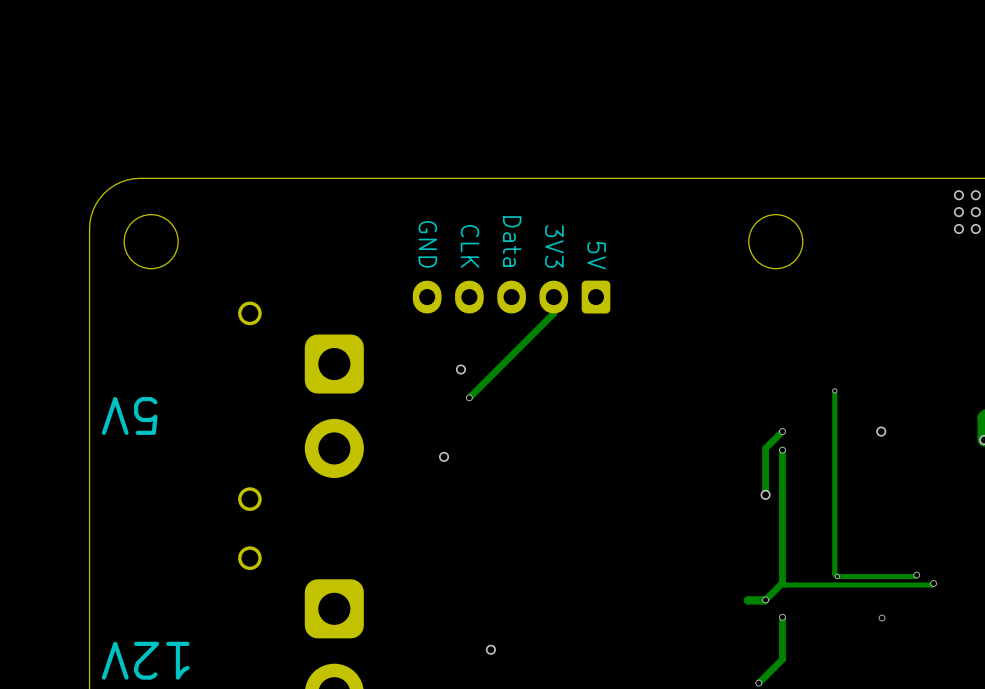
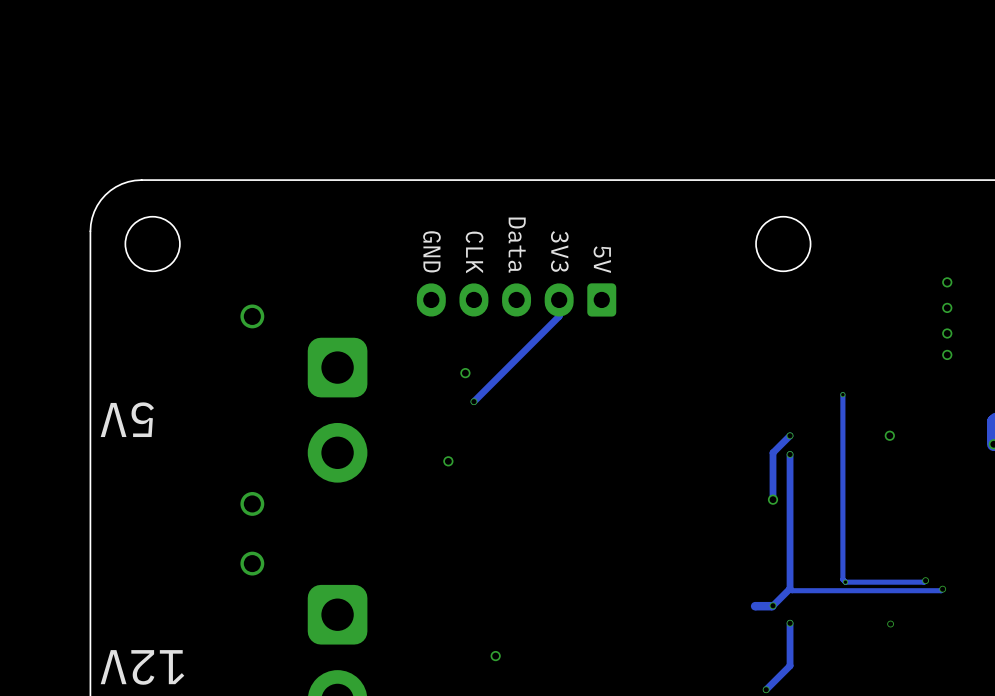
via: (958, 195) -> none
via: (975, 195) -> none
via: (958, 212) -> none
via: (975, 212) -> none
via: (958, 228) -> none
via: (975, 228) -> none
via: none -> (947, 282)
via: none -> (947, 307)
via: none -> (947, 333)
via: none -> (947, 354)

